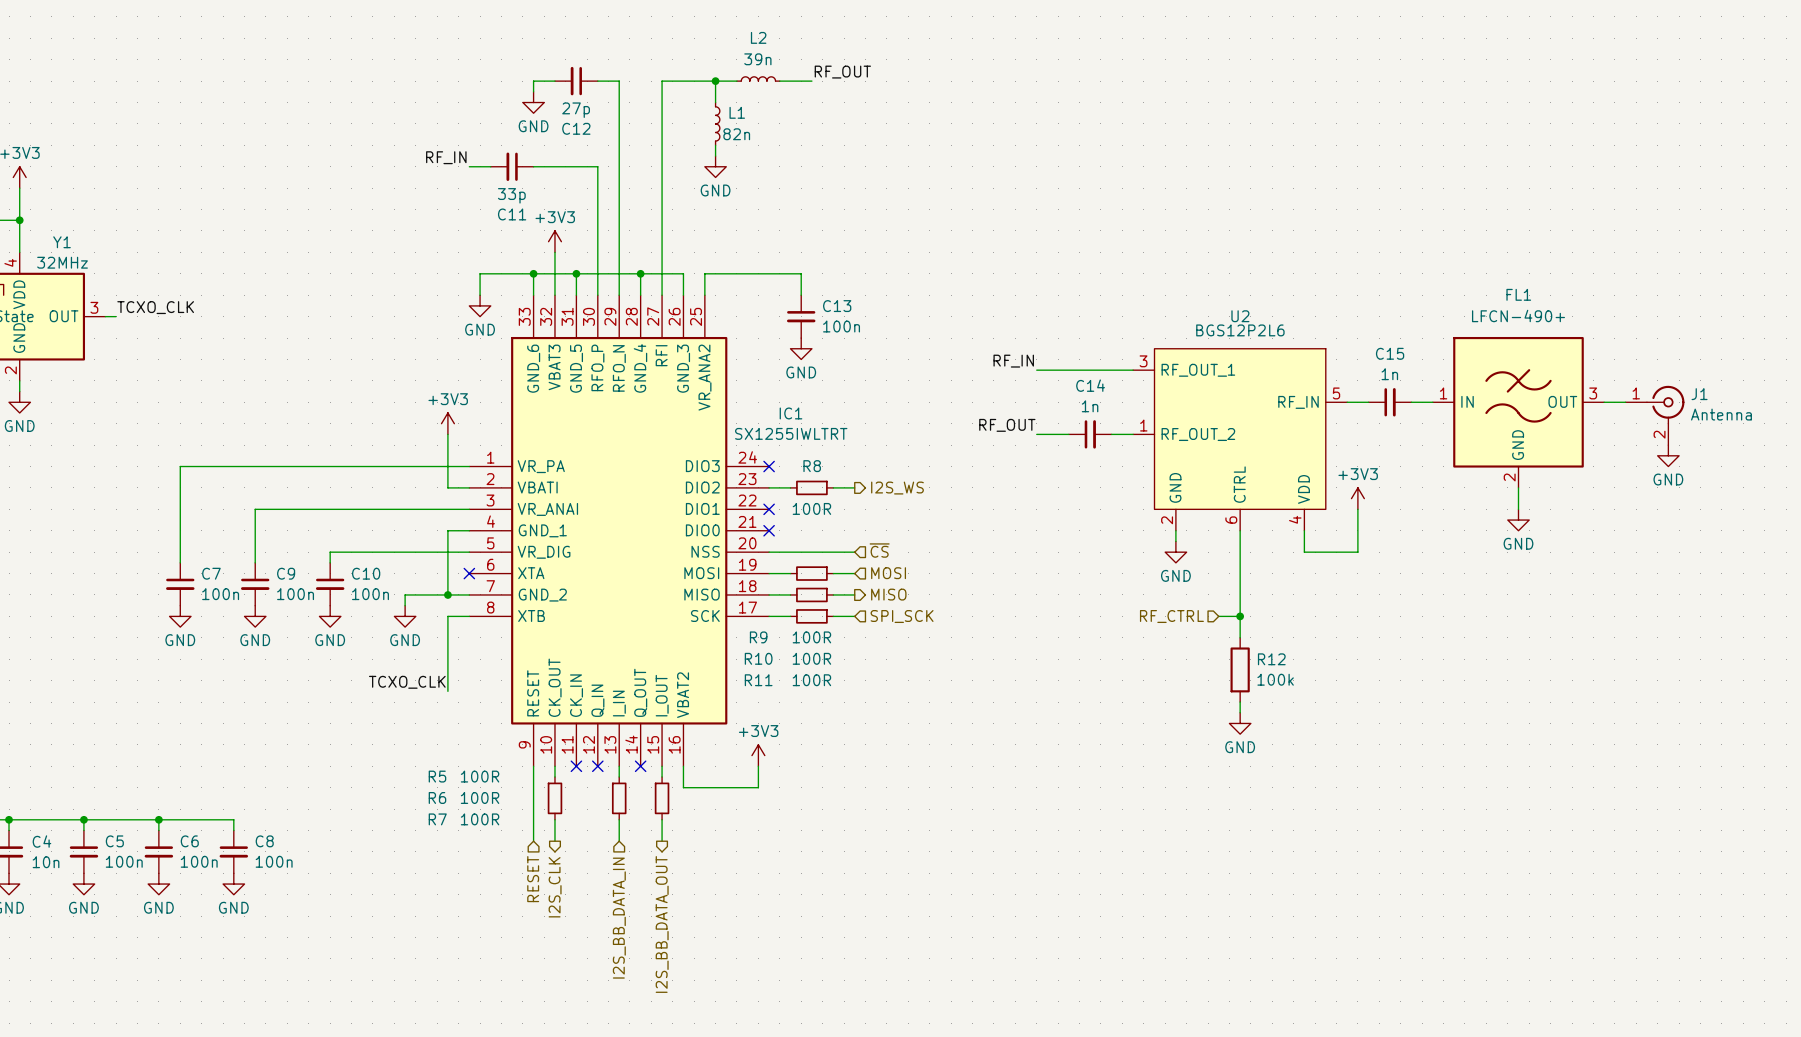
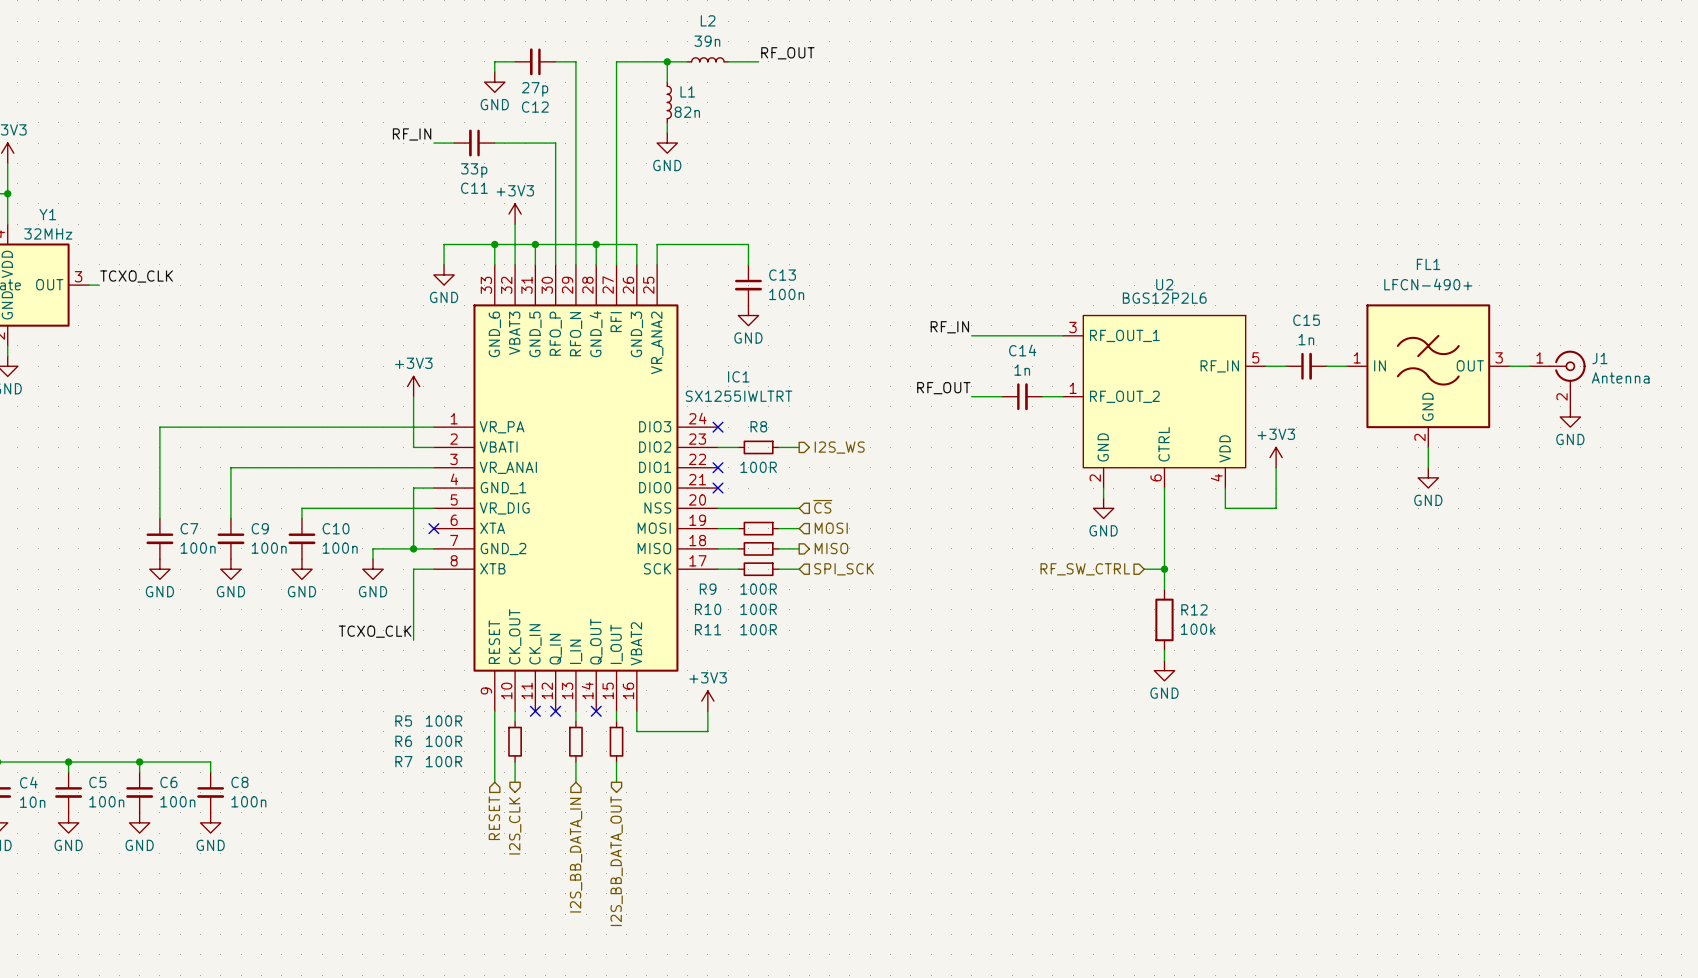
hierarchical label: RF_CTRL (1171, 616) -> RF_SW_CTRL (1085, 569)

